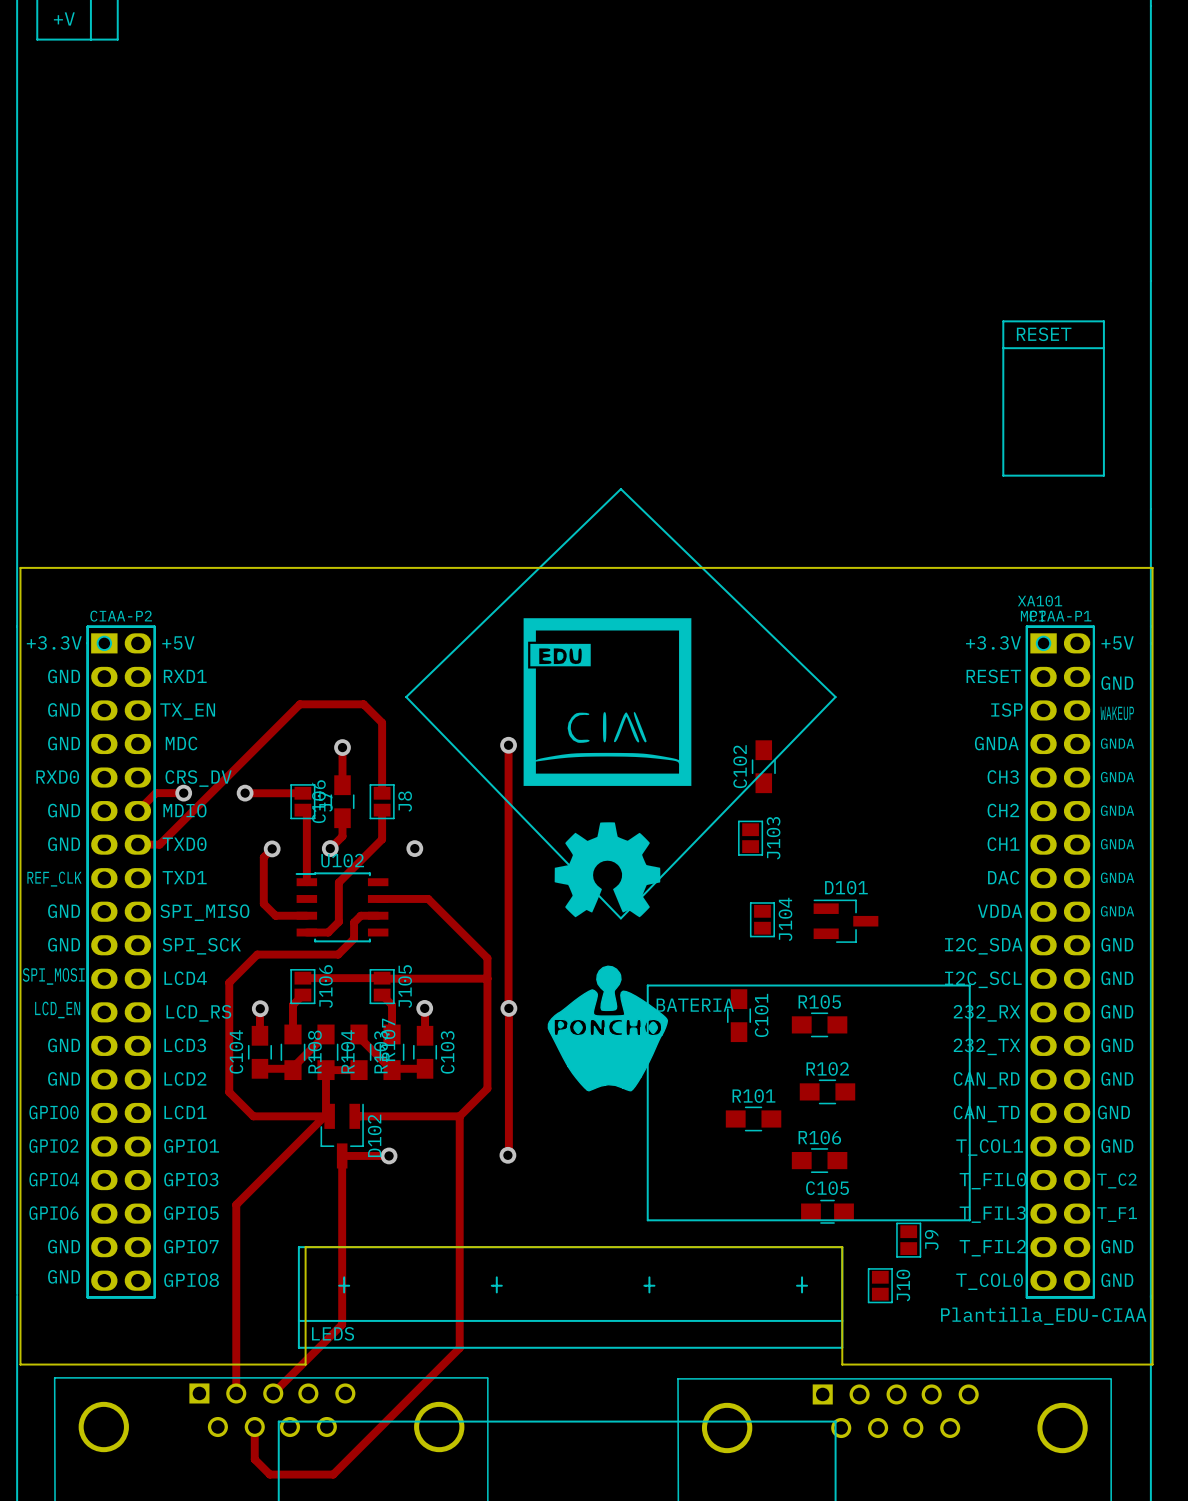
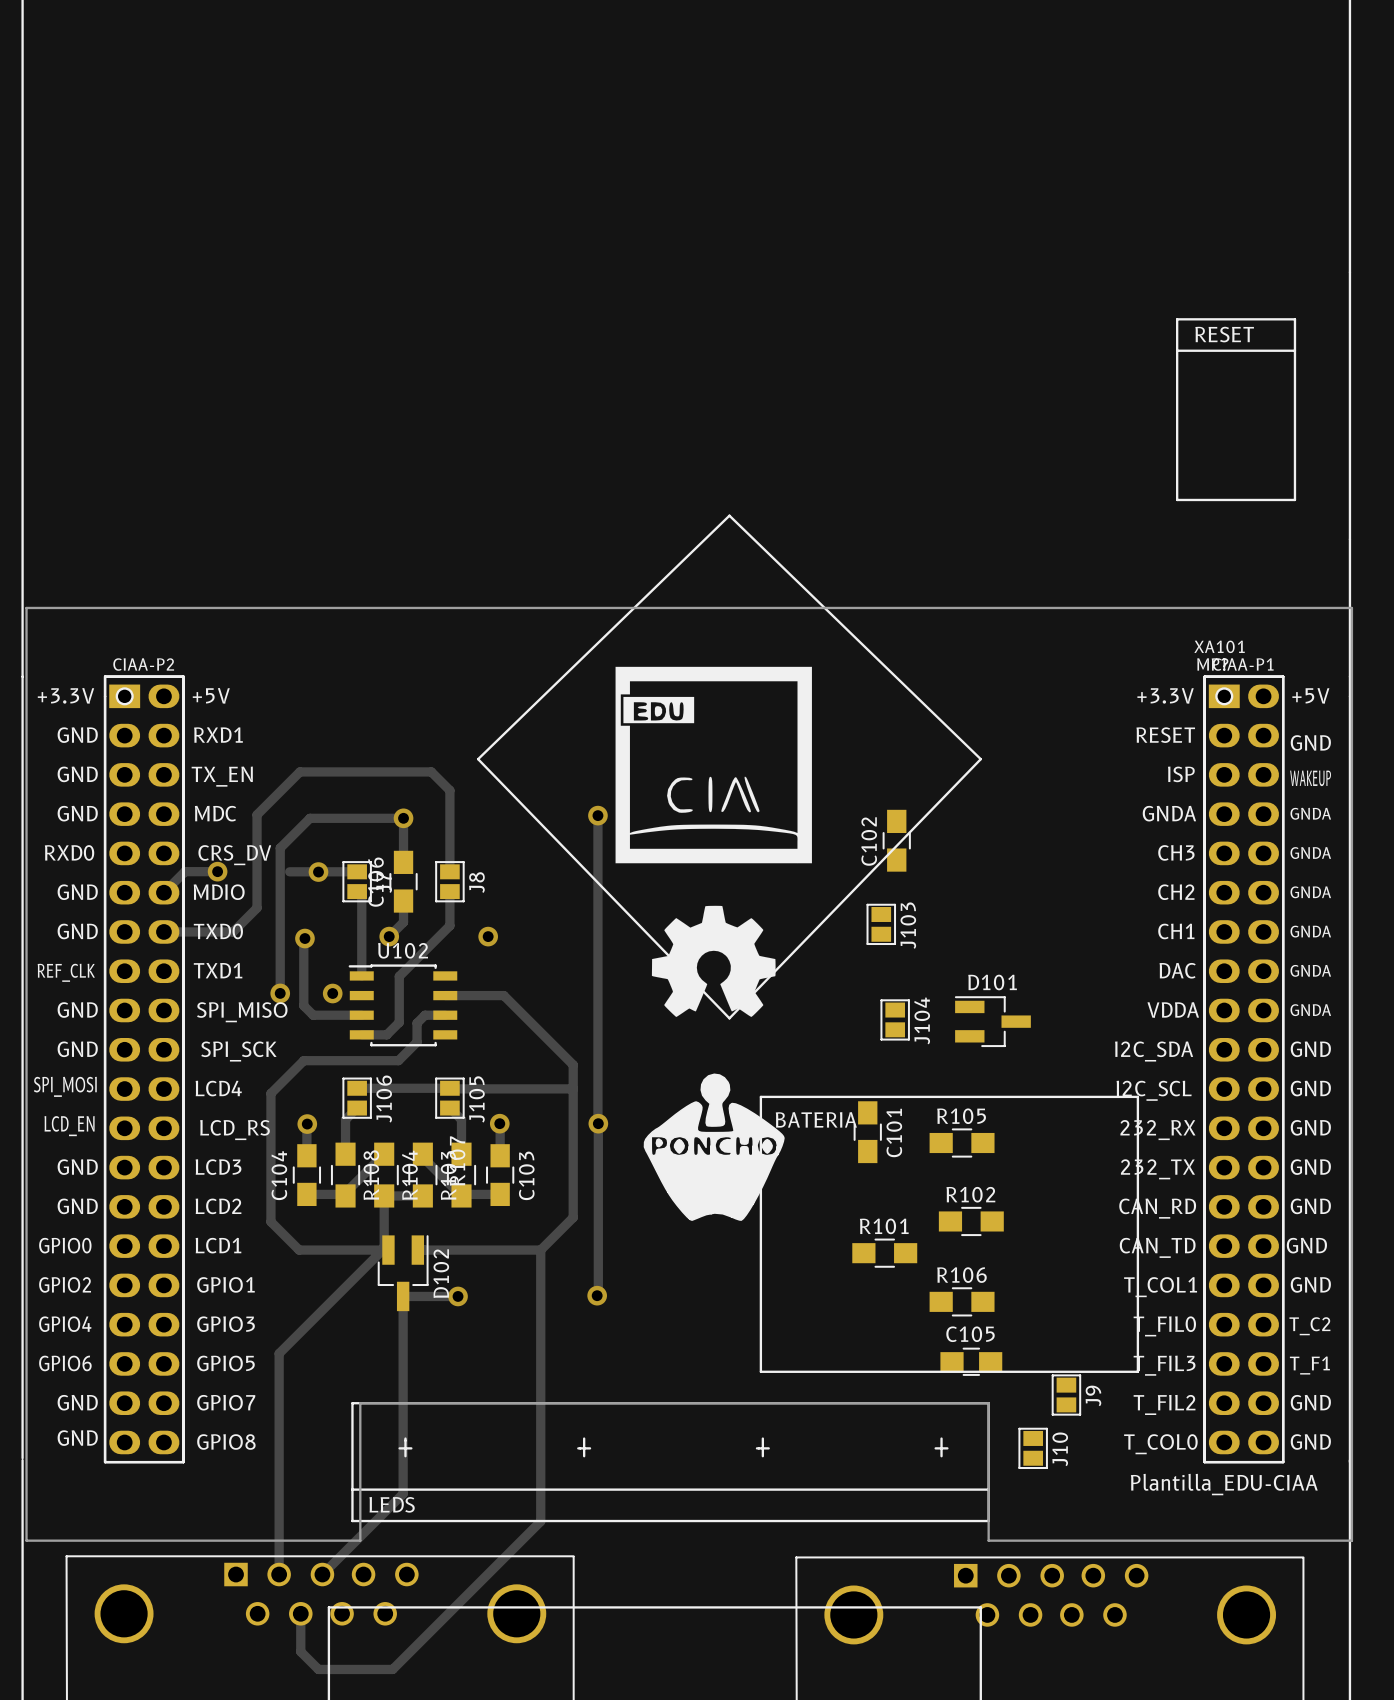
track: (382, 723) (363, 704) (299, 704) (159, 844) -> (449, 790) (431, 771) (299, 771) (257, 814) (257, 907) (233, 931) (189, 931)
track: none -> (403, 818) (309, 818) (280, 848) (280, 993)
via position: (245, 793) -> (318, 872)
track: (272, 848) (263, 857) (263, 903) (275, 915) -> (304, 938) (303, 1005) (313, 1015) (325, 1015)
via position: (272, 848) -> (304, 938)
via: none -> (280, 993)
via: none -> (332, 993)

